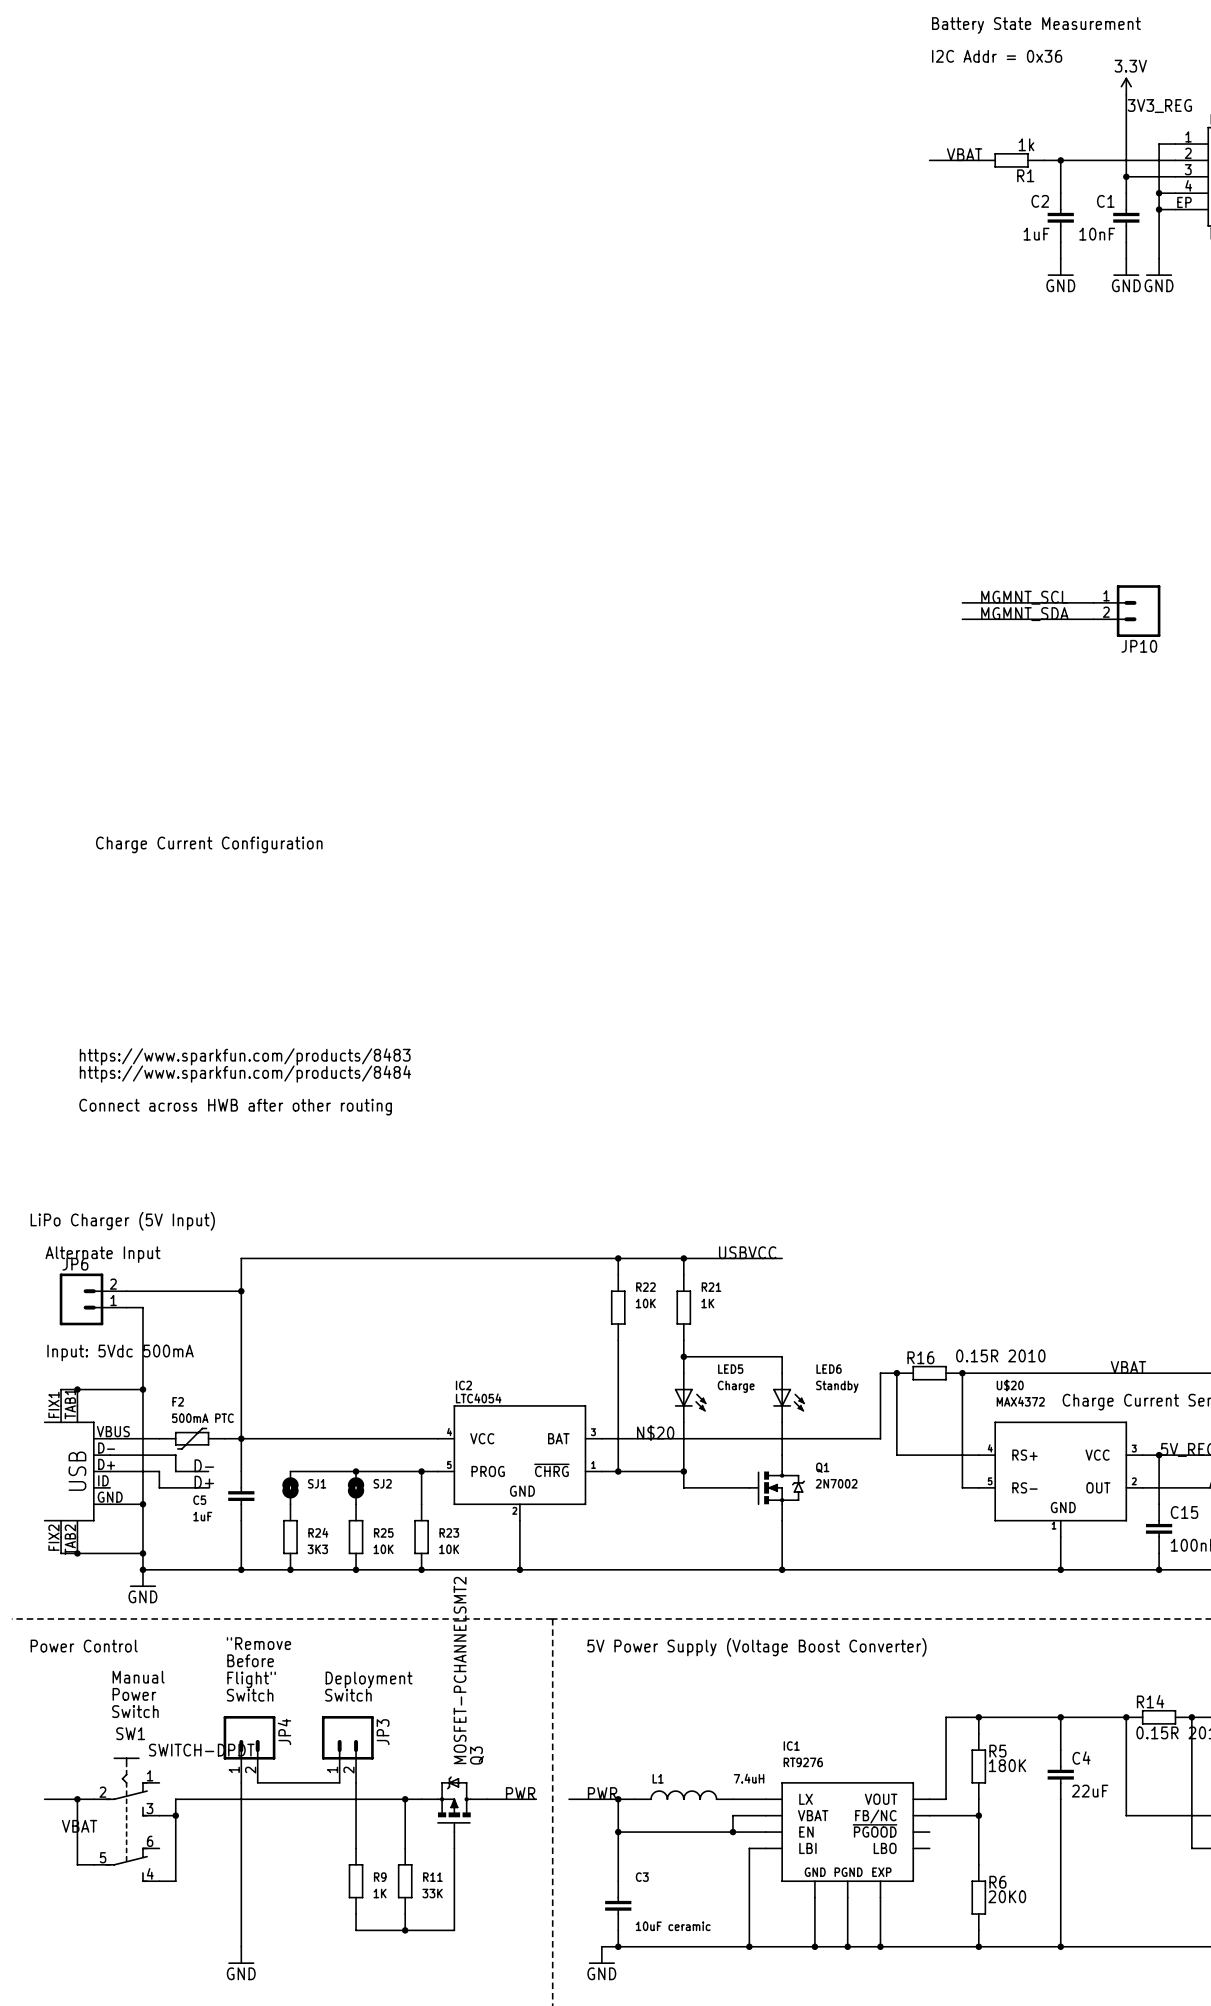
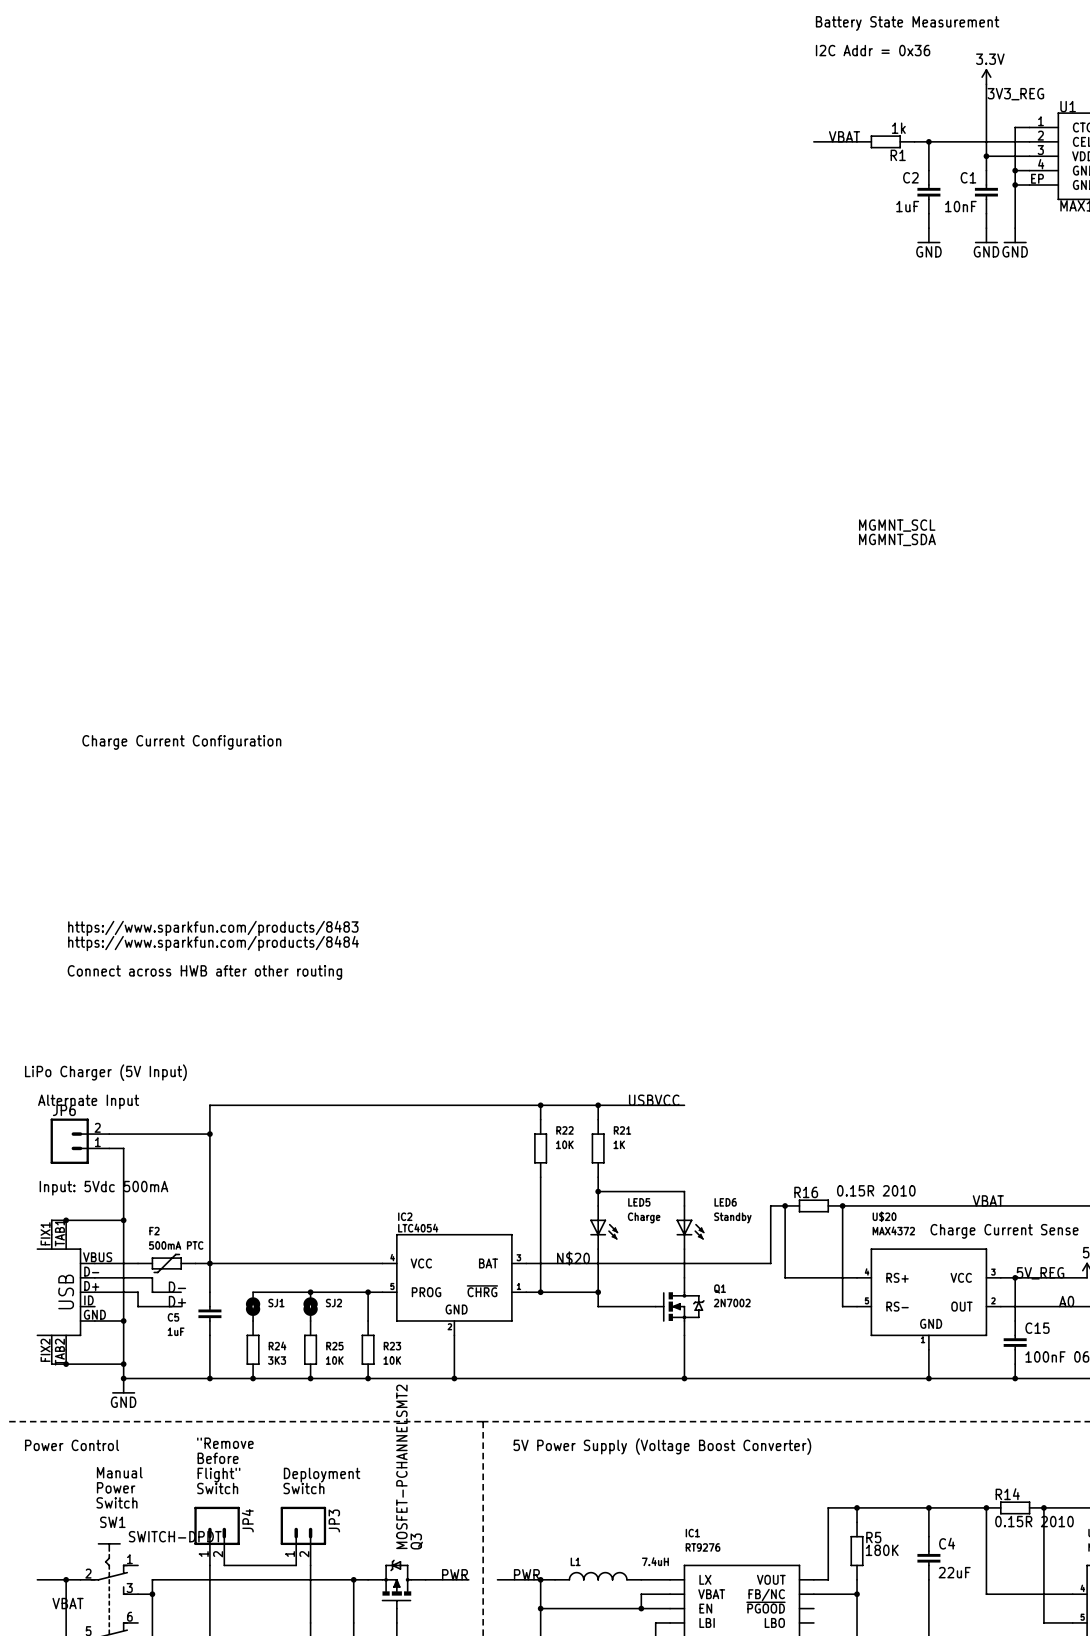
wire: (962, 602) (1093, 602) -> none
JP10: (1126, 611) -> none
wire: (962, 619) (1093, 619) -> none

